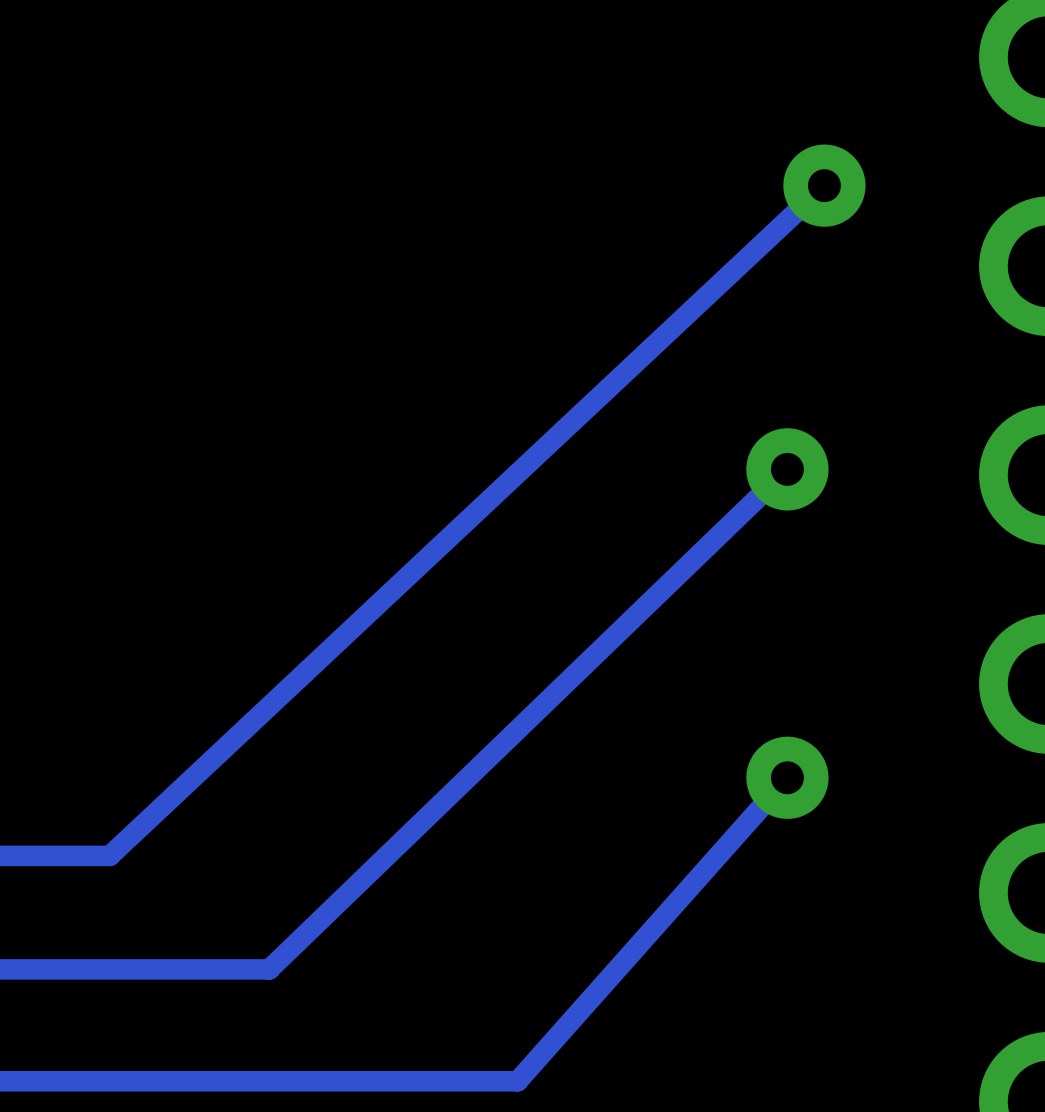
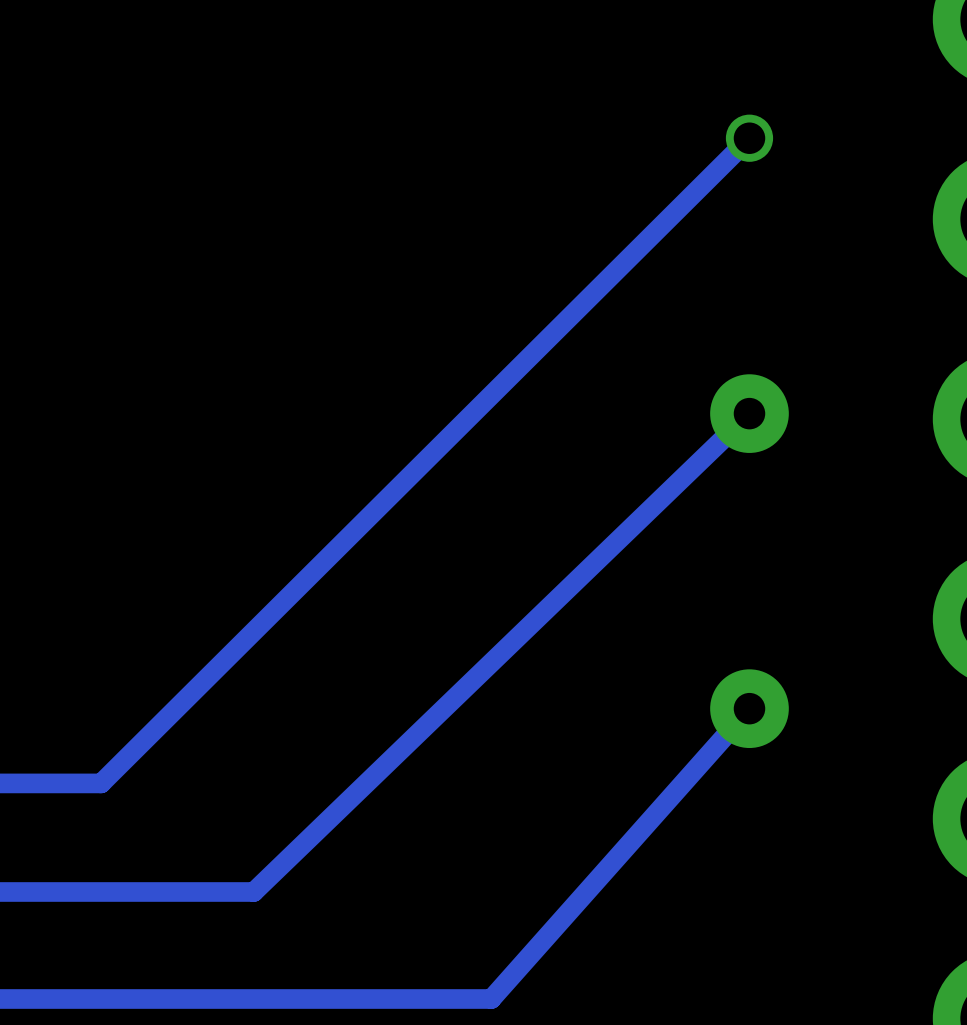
via size: [783, 144, 866, 227] -> [725, 114, 774, 162]
track: (824, 185) (109, 855) -> (749, 138) (101, 783)

